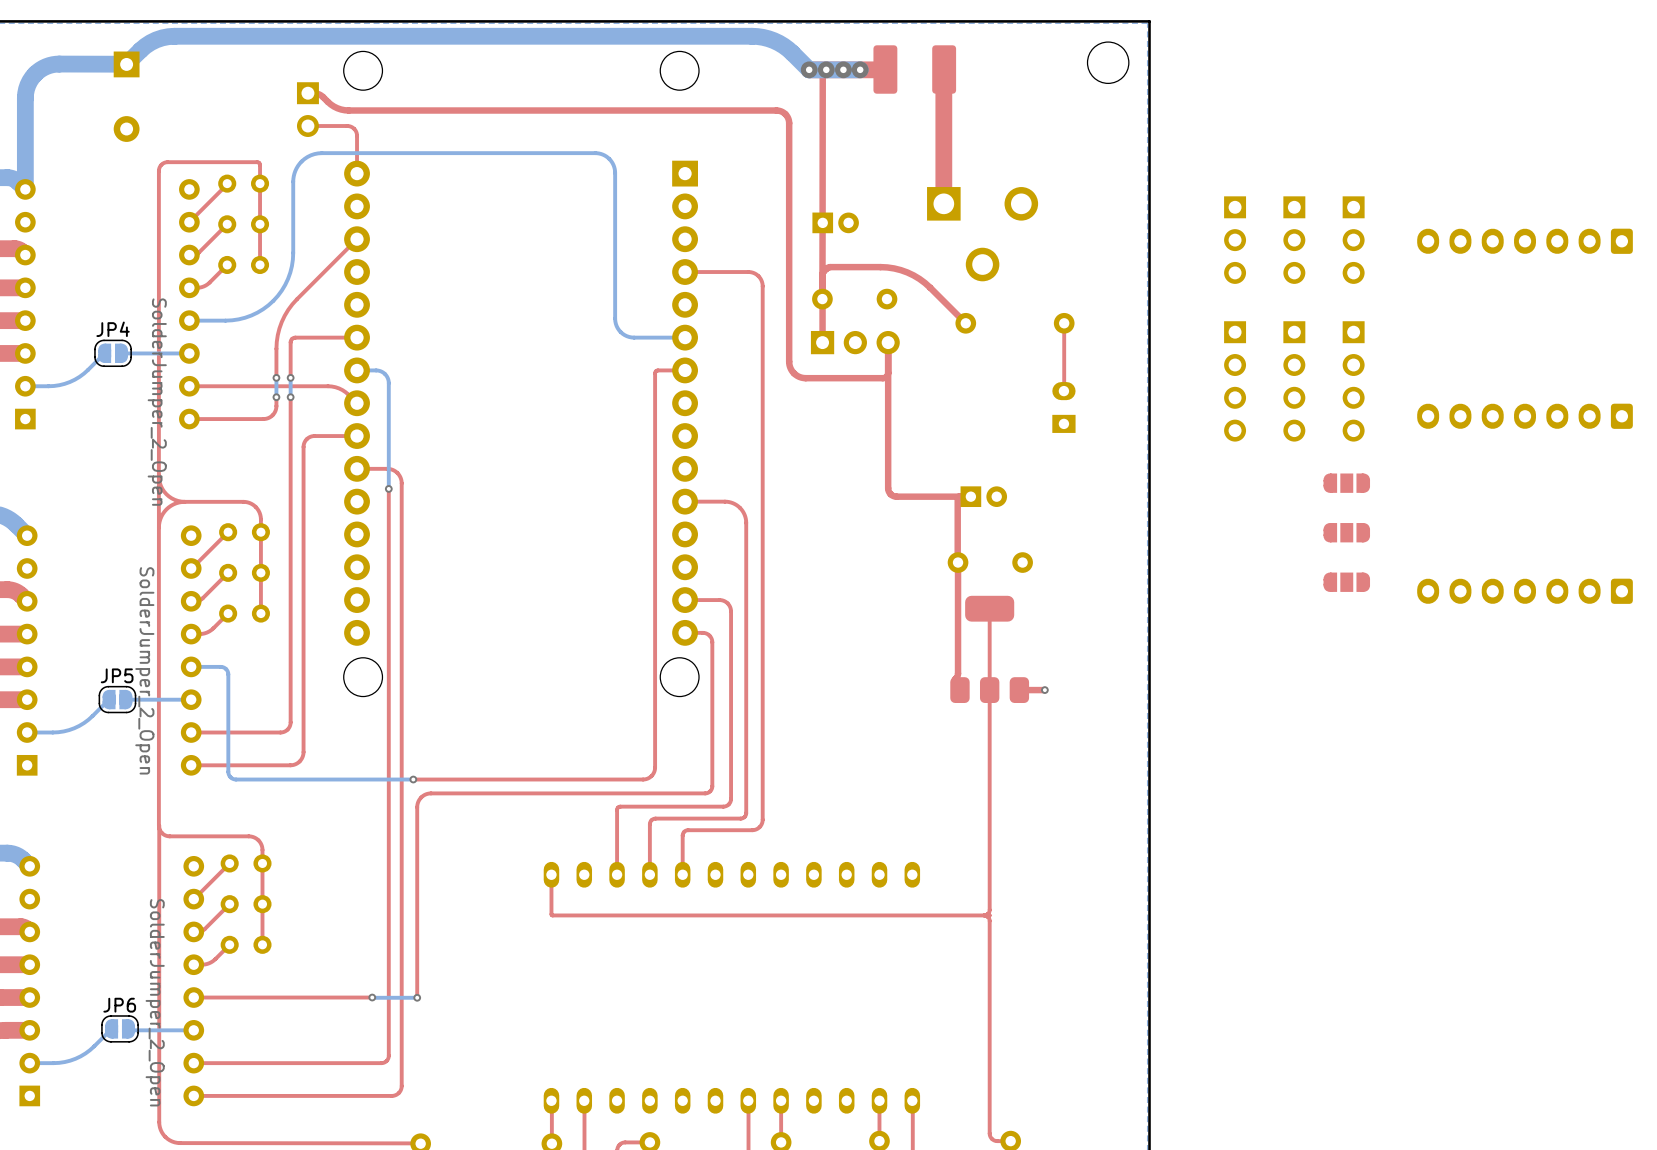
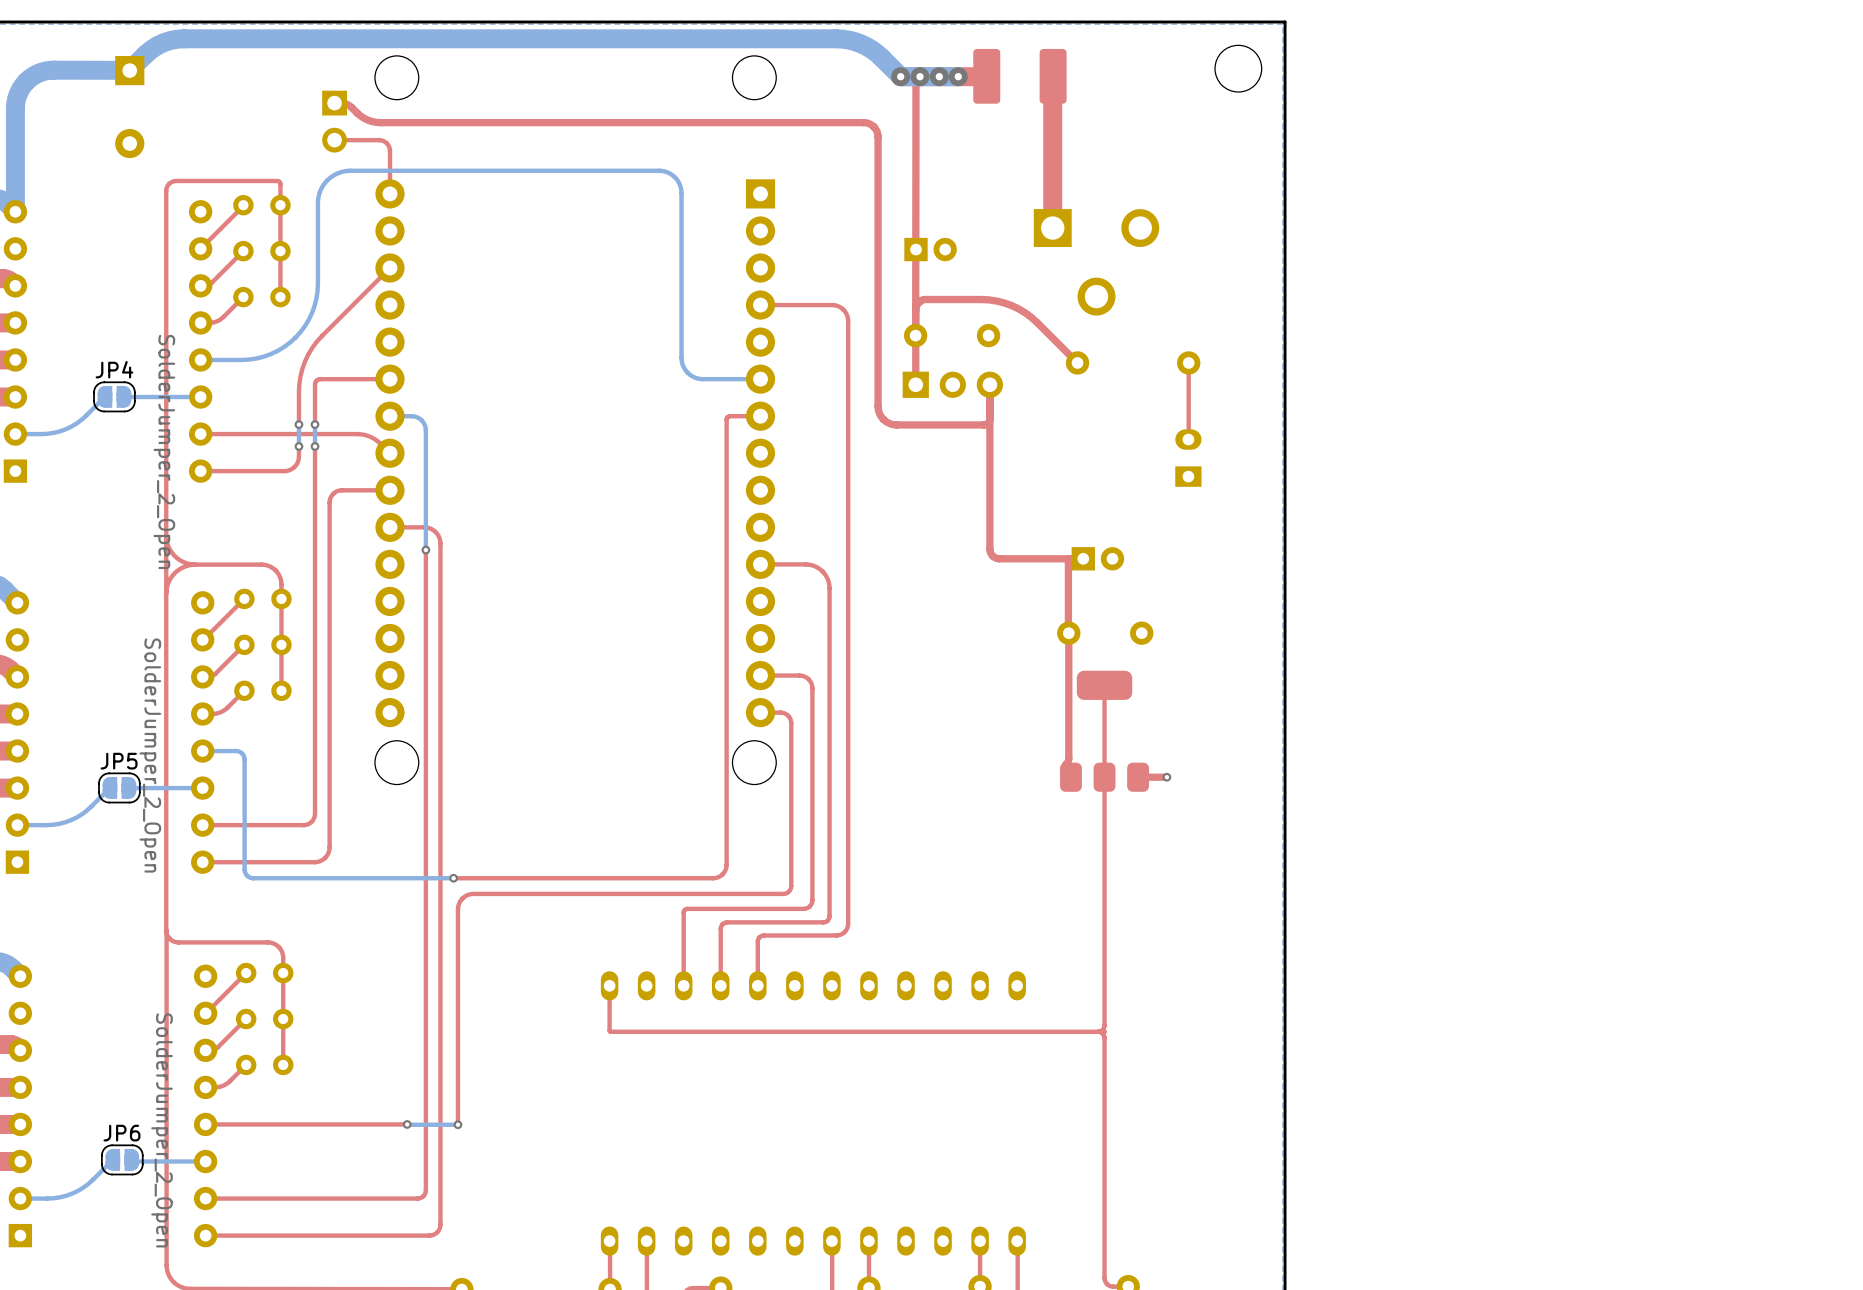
part: (1235, 240) -> none
part: (1294, 240) -> none
part: (1353, 240) -> none
part: (1525, 241) -> none
part: (1235, 381) -> none
part: (1294, 381) -> none
part: (1353, 381) -> none
part: (1525, 416) -> none
part: (1346, 483) -> none
part: (1346, 532) -> none
part: (1346, 582) -> none
part: (1525, 591) -> none

